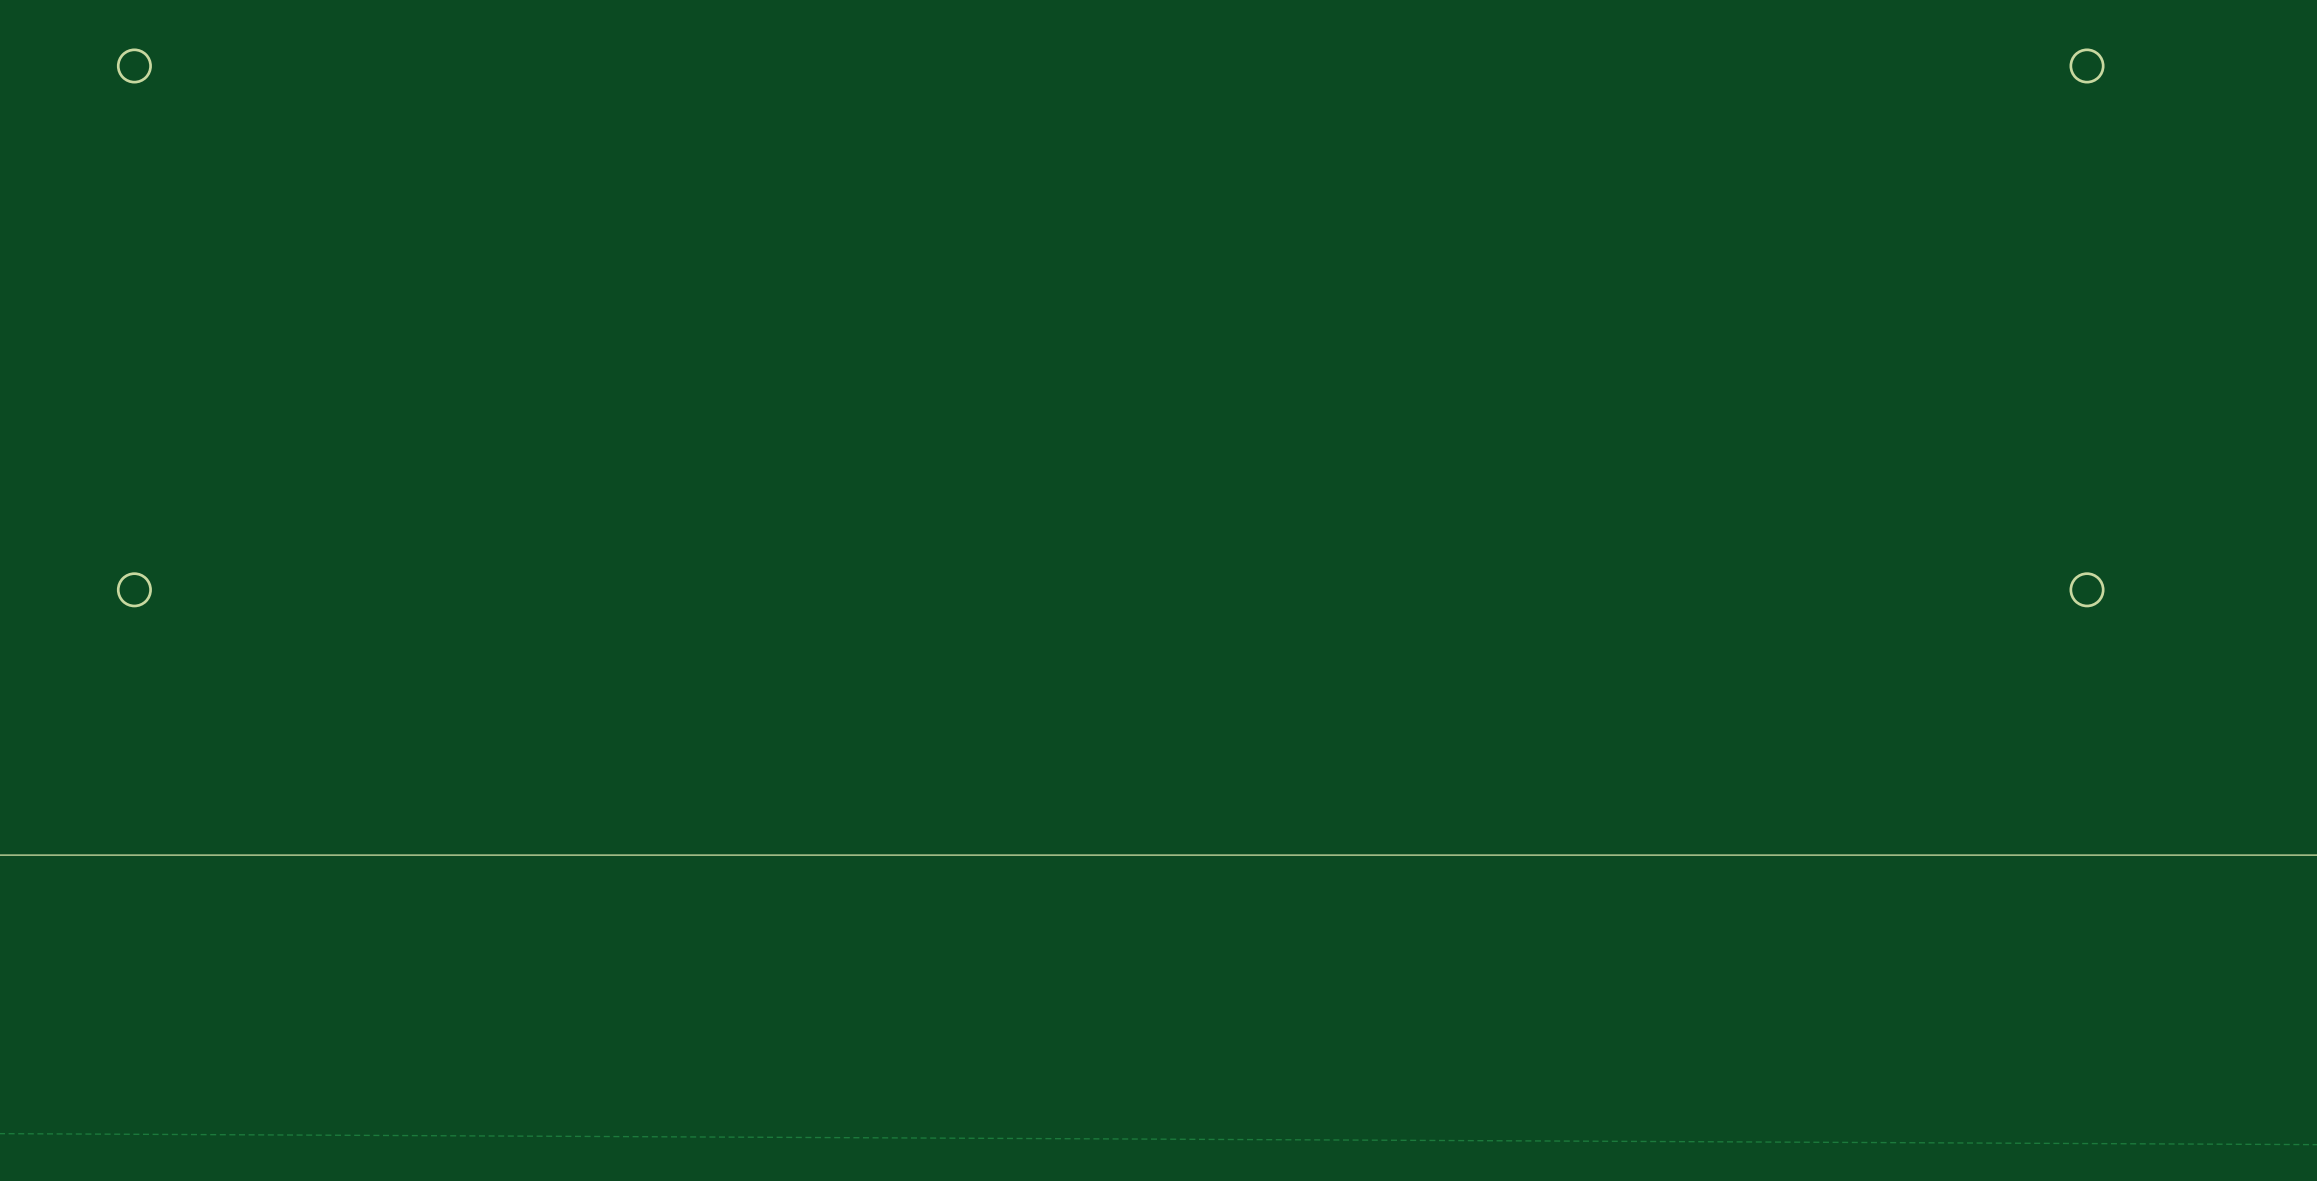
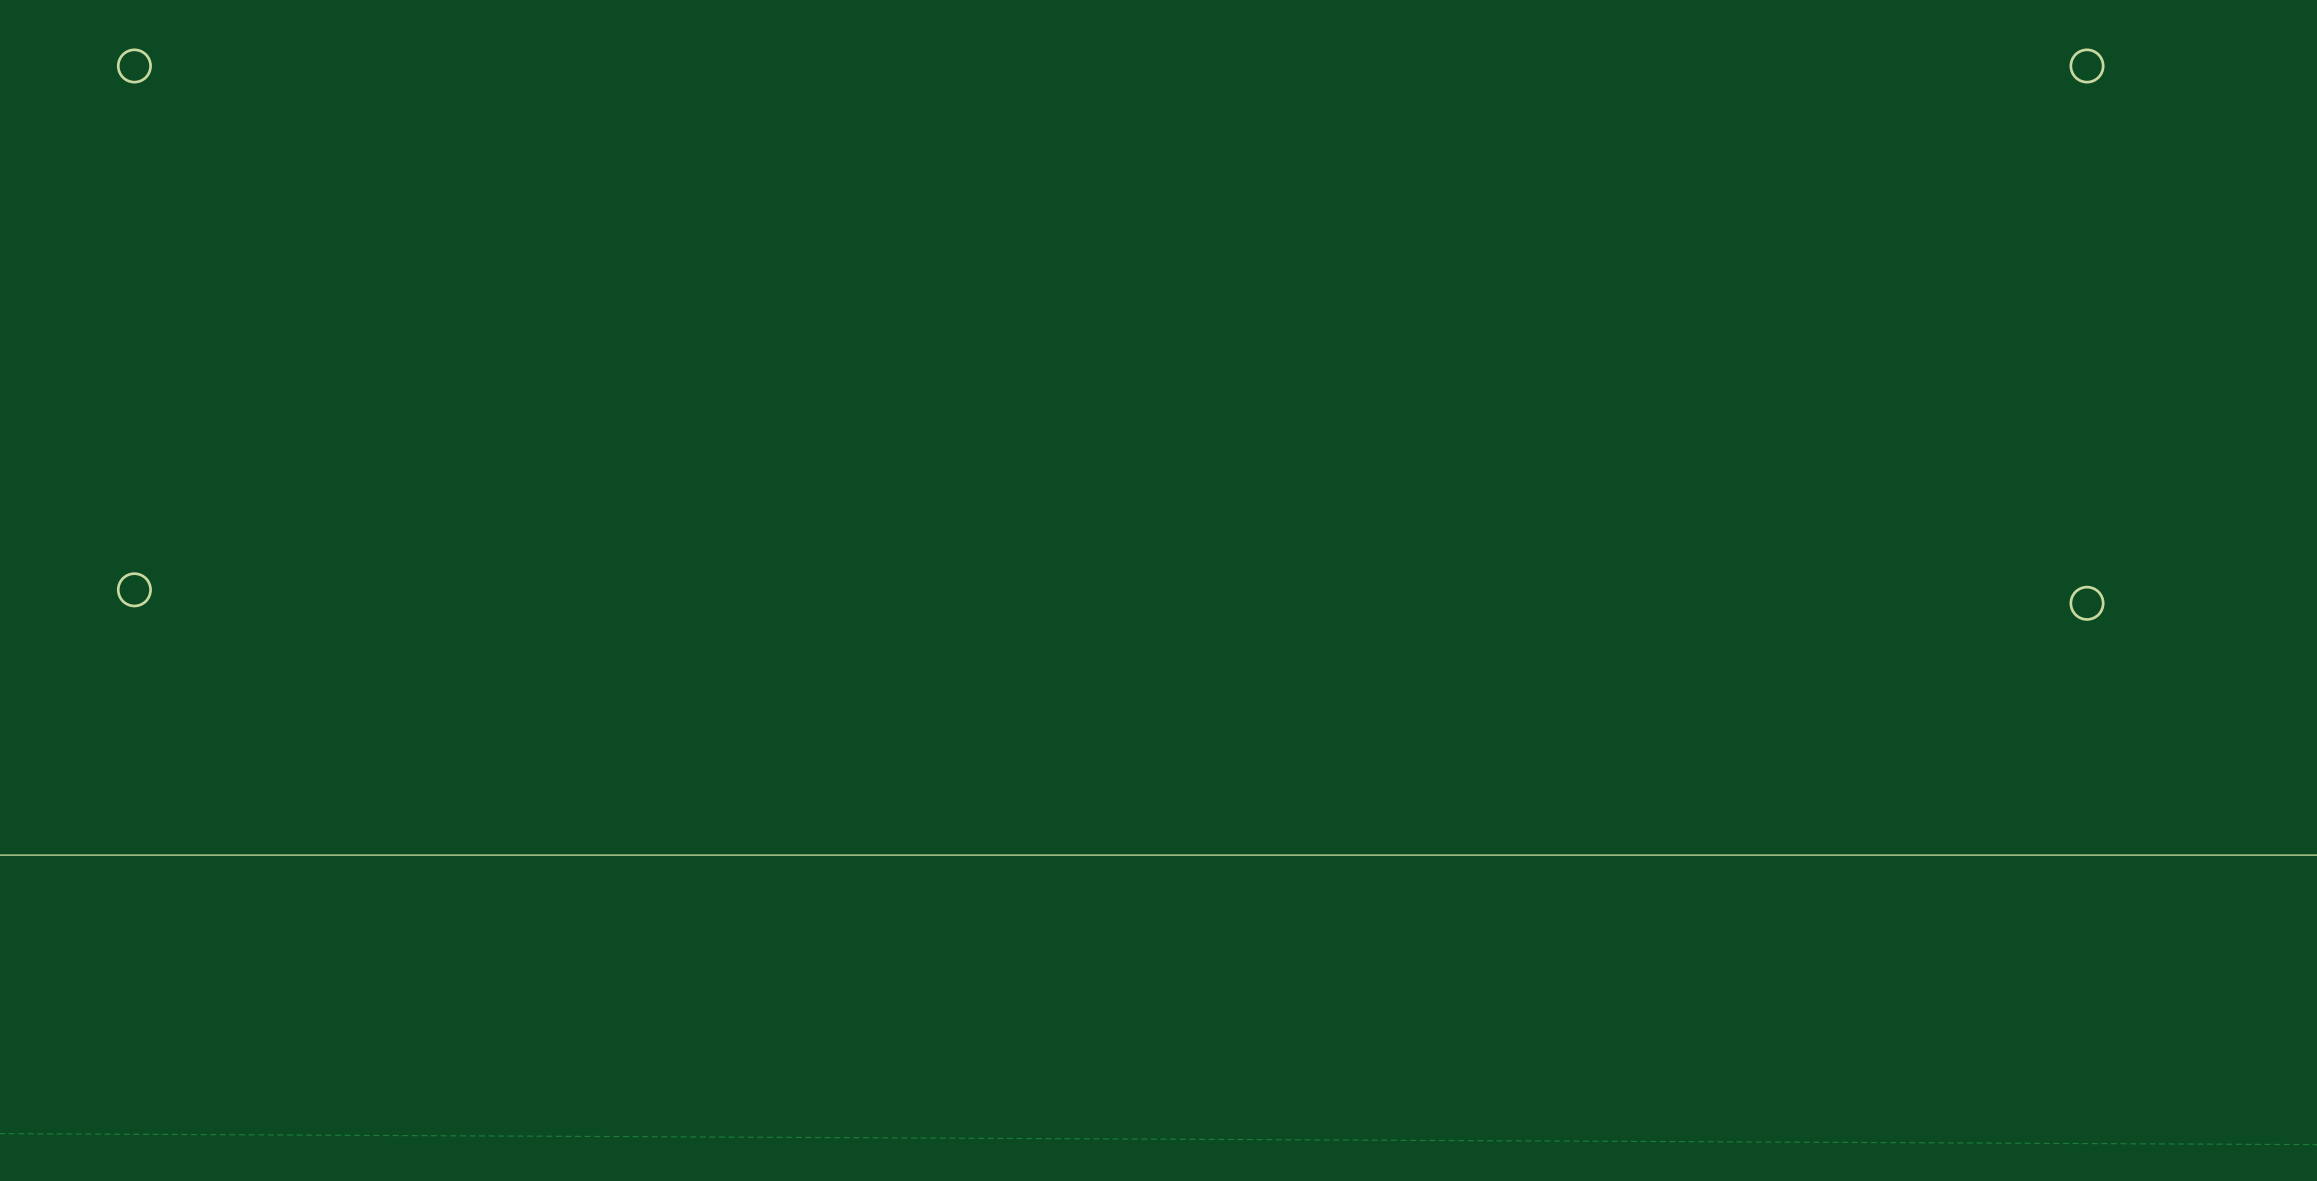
round board edge position: (2087, 589) -> (2087, 603)

